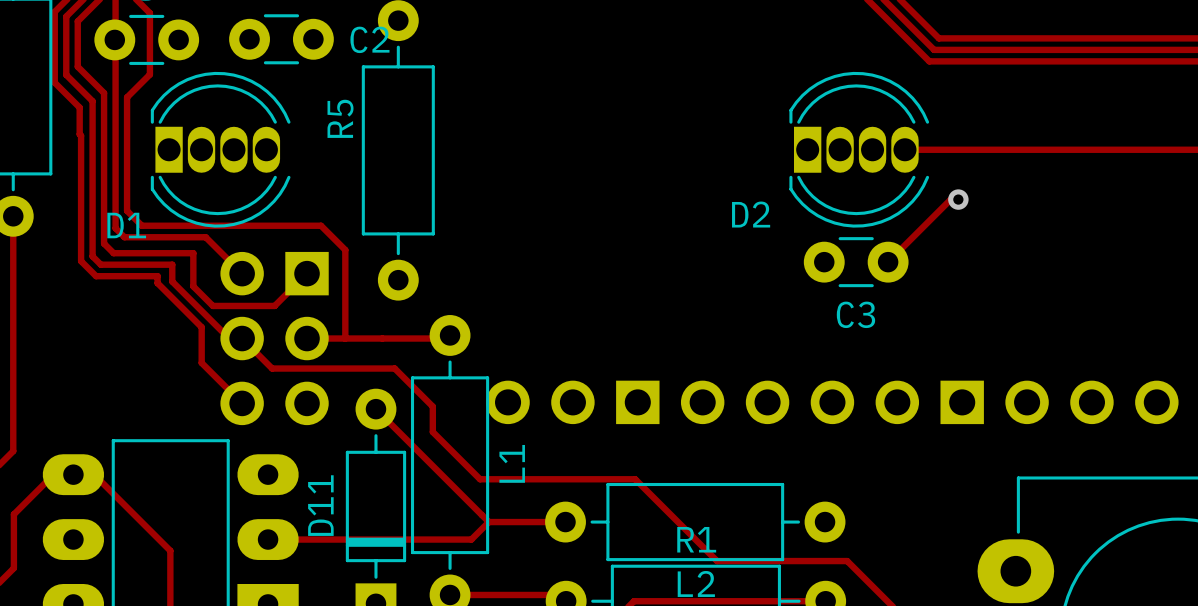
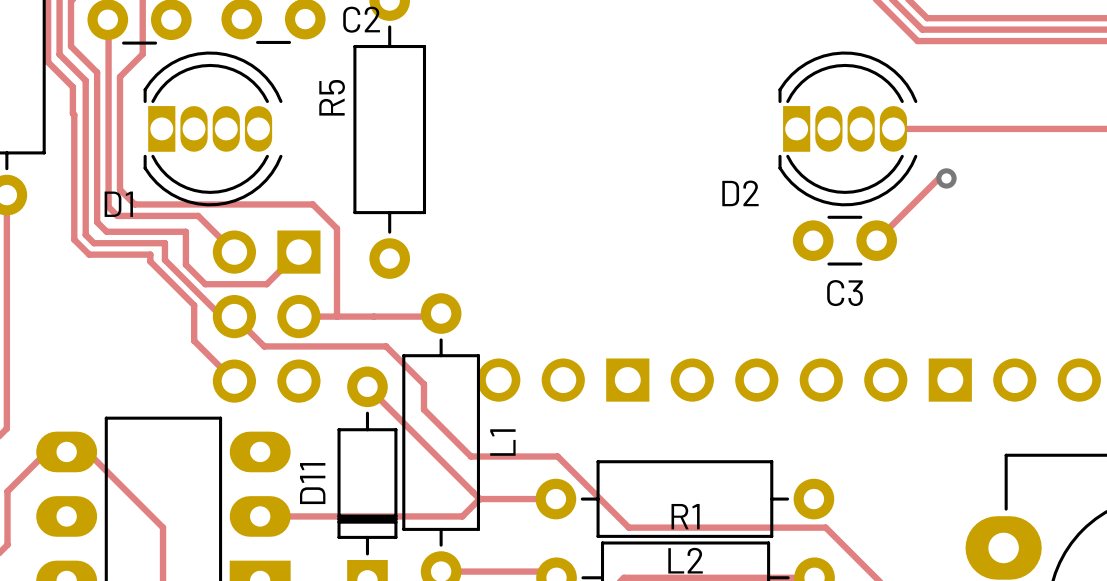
track: (567, 479) (635, 479) (717, 561) (847, 561) -> (557, 456) (628, 527) (825, 527) (835, 537)

